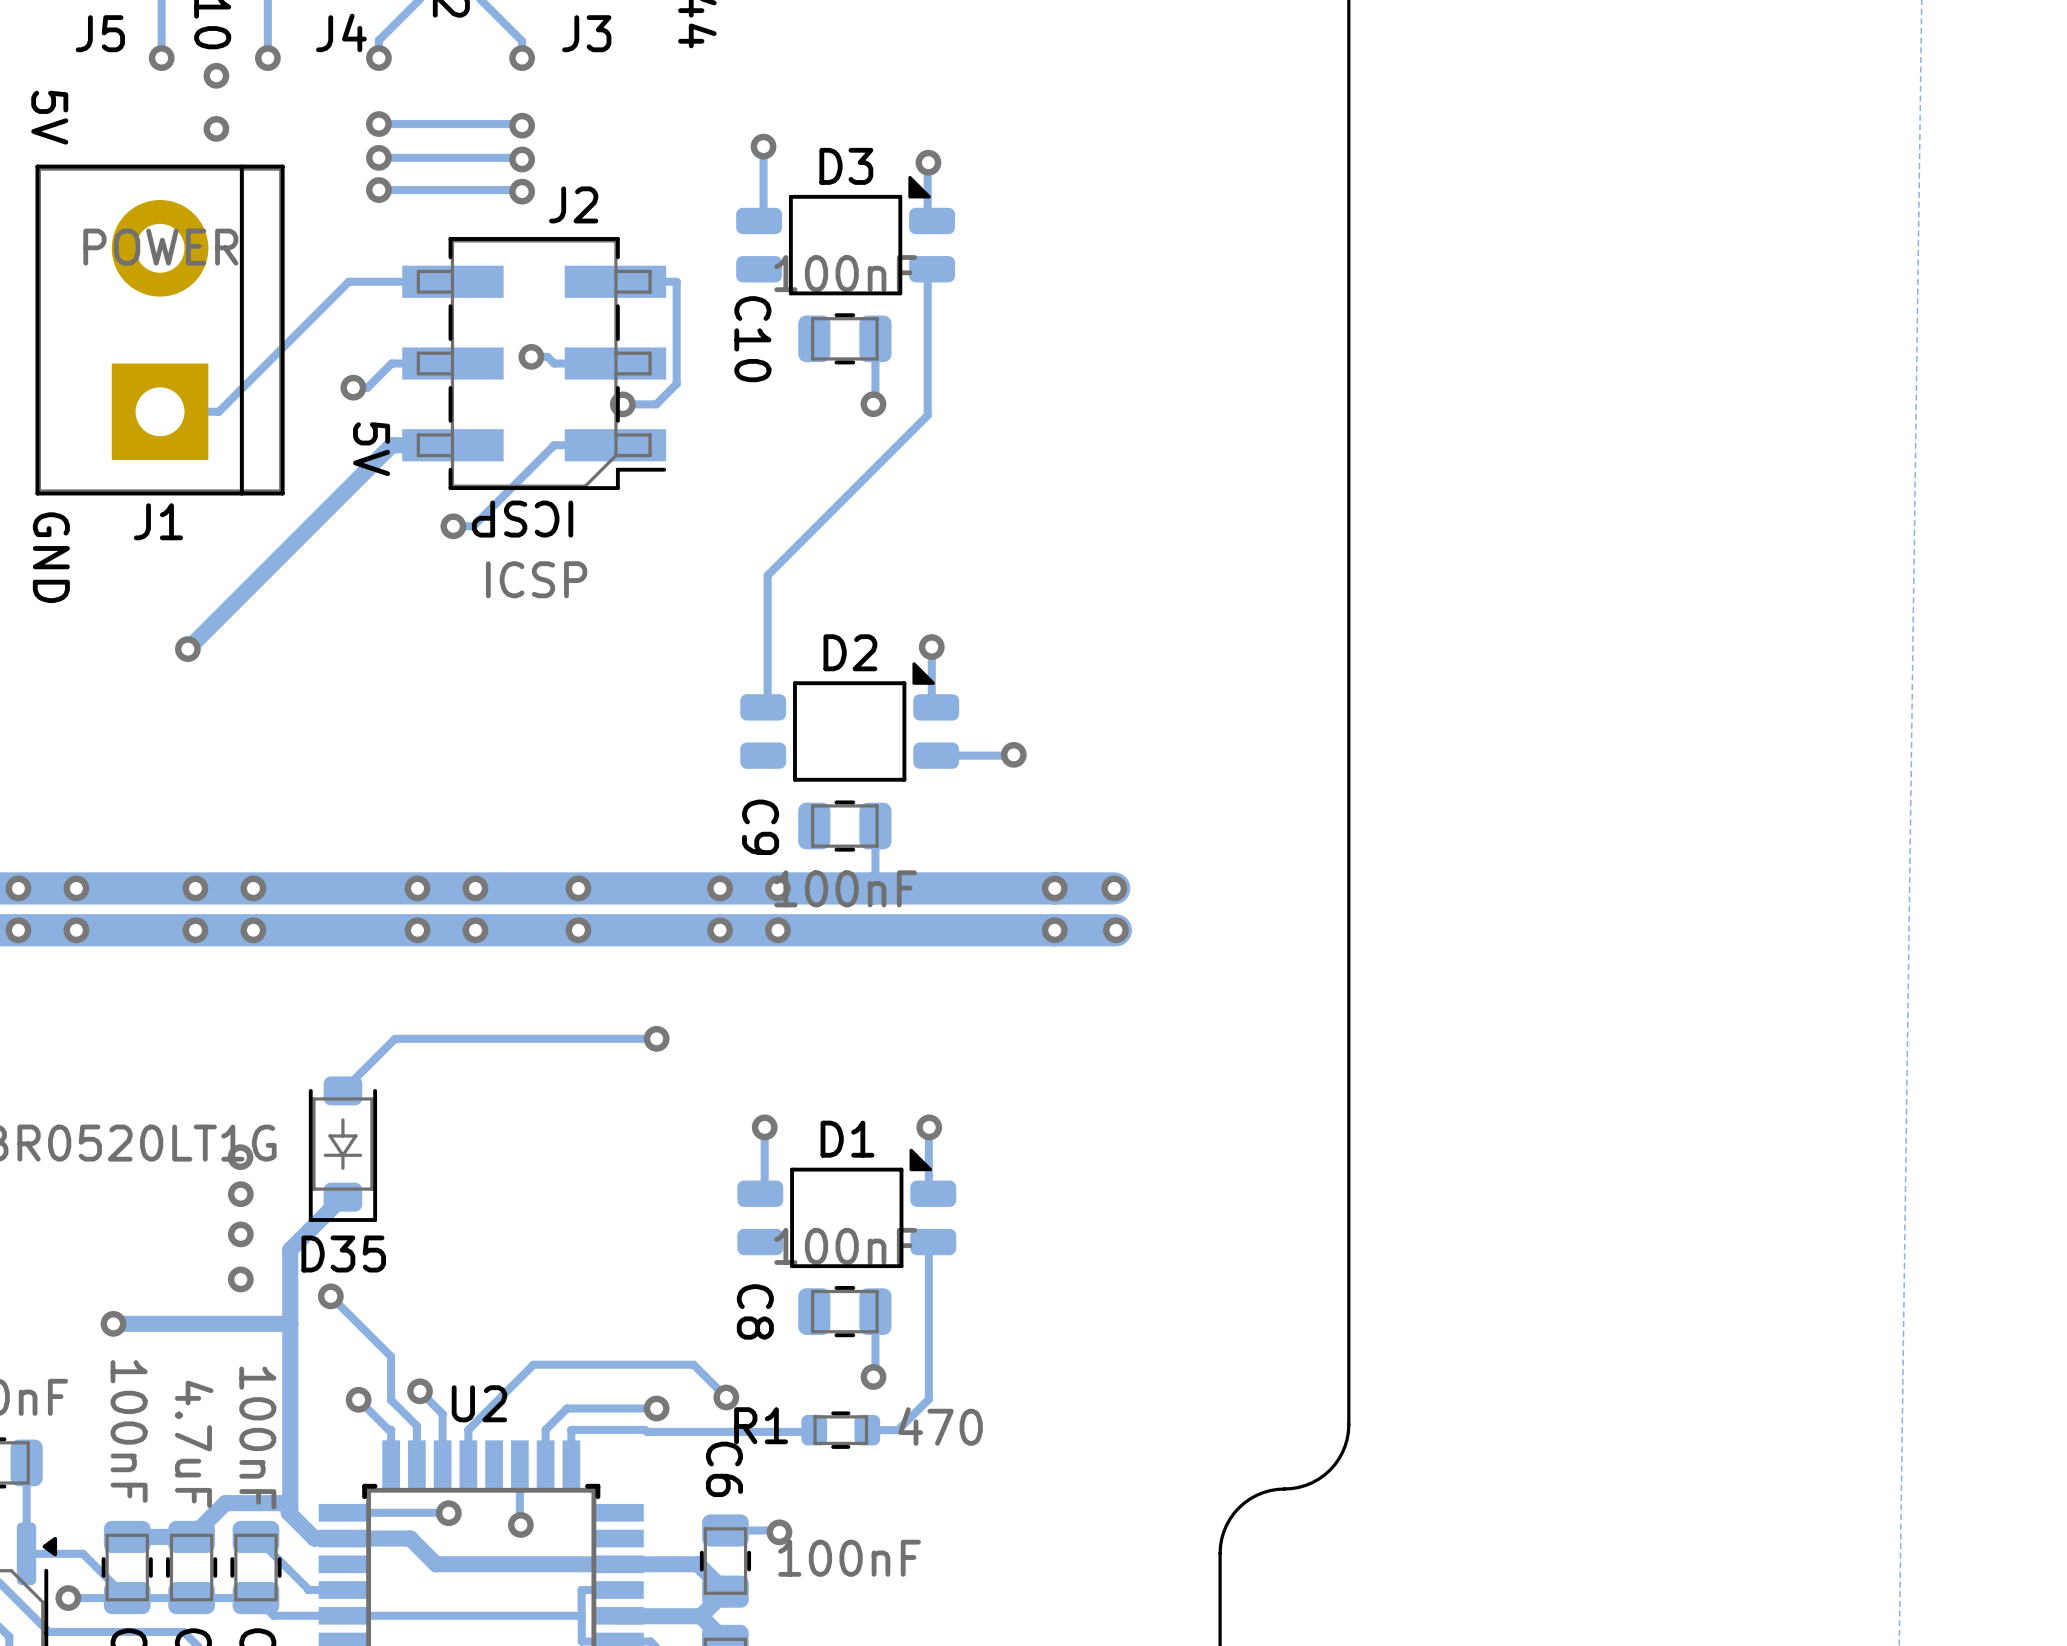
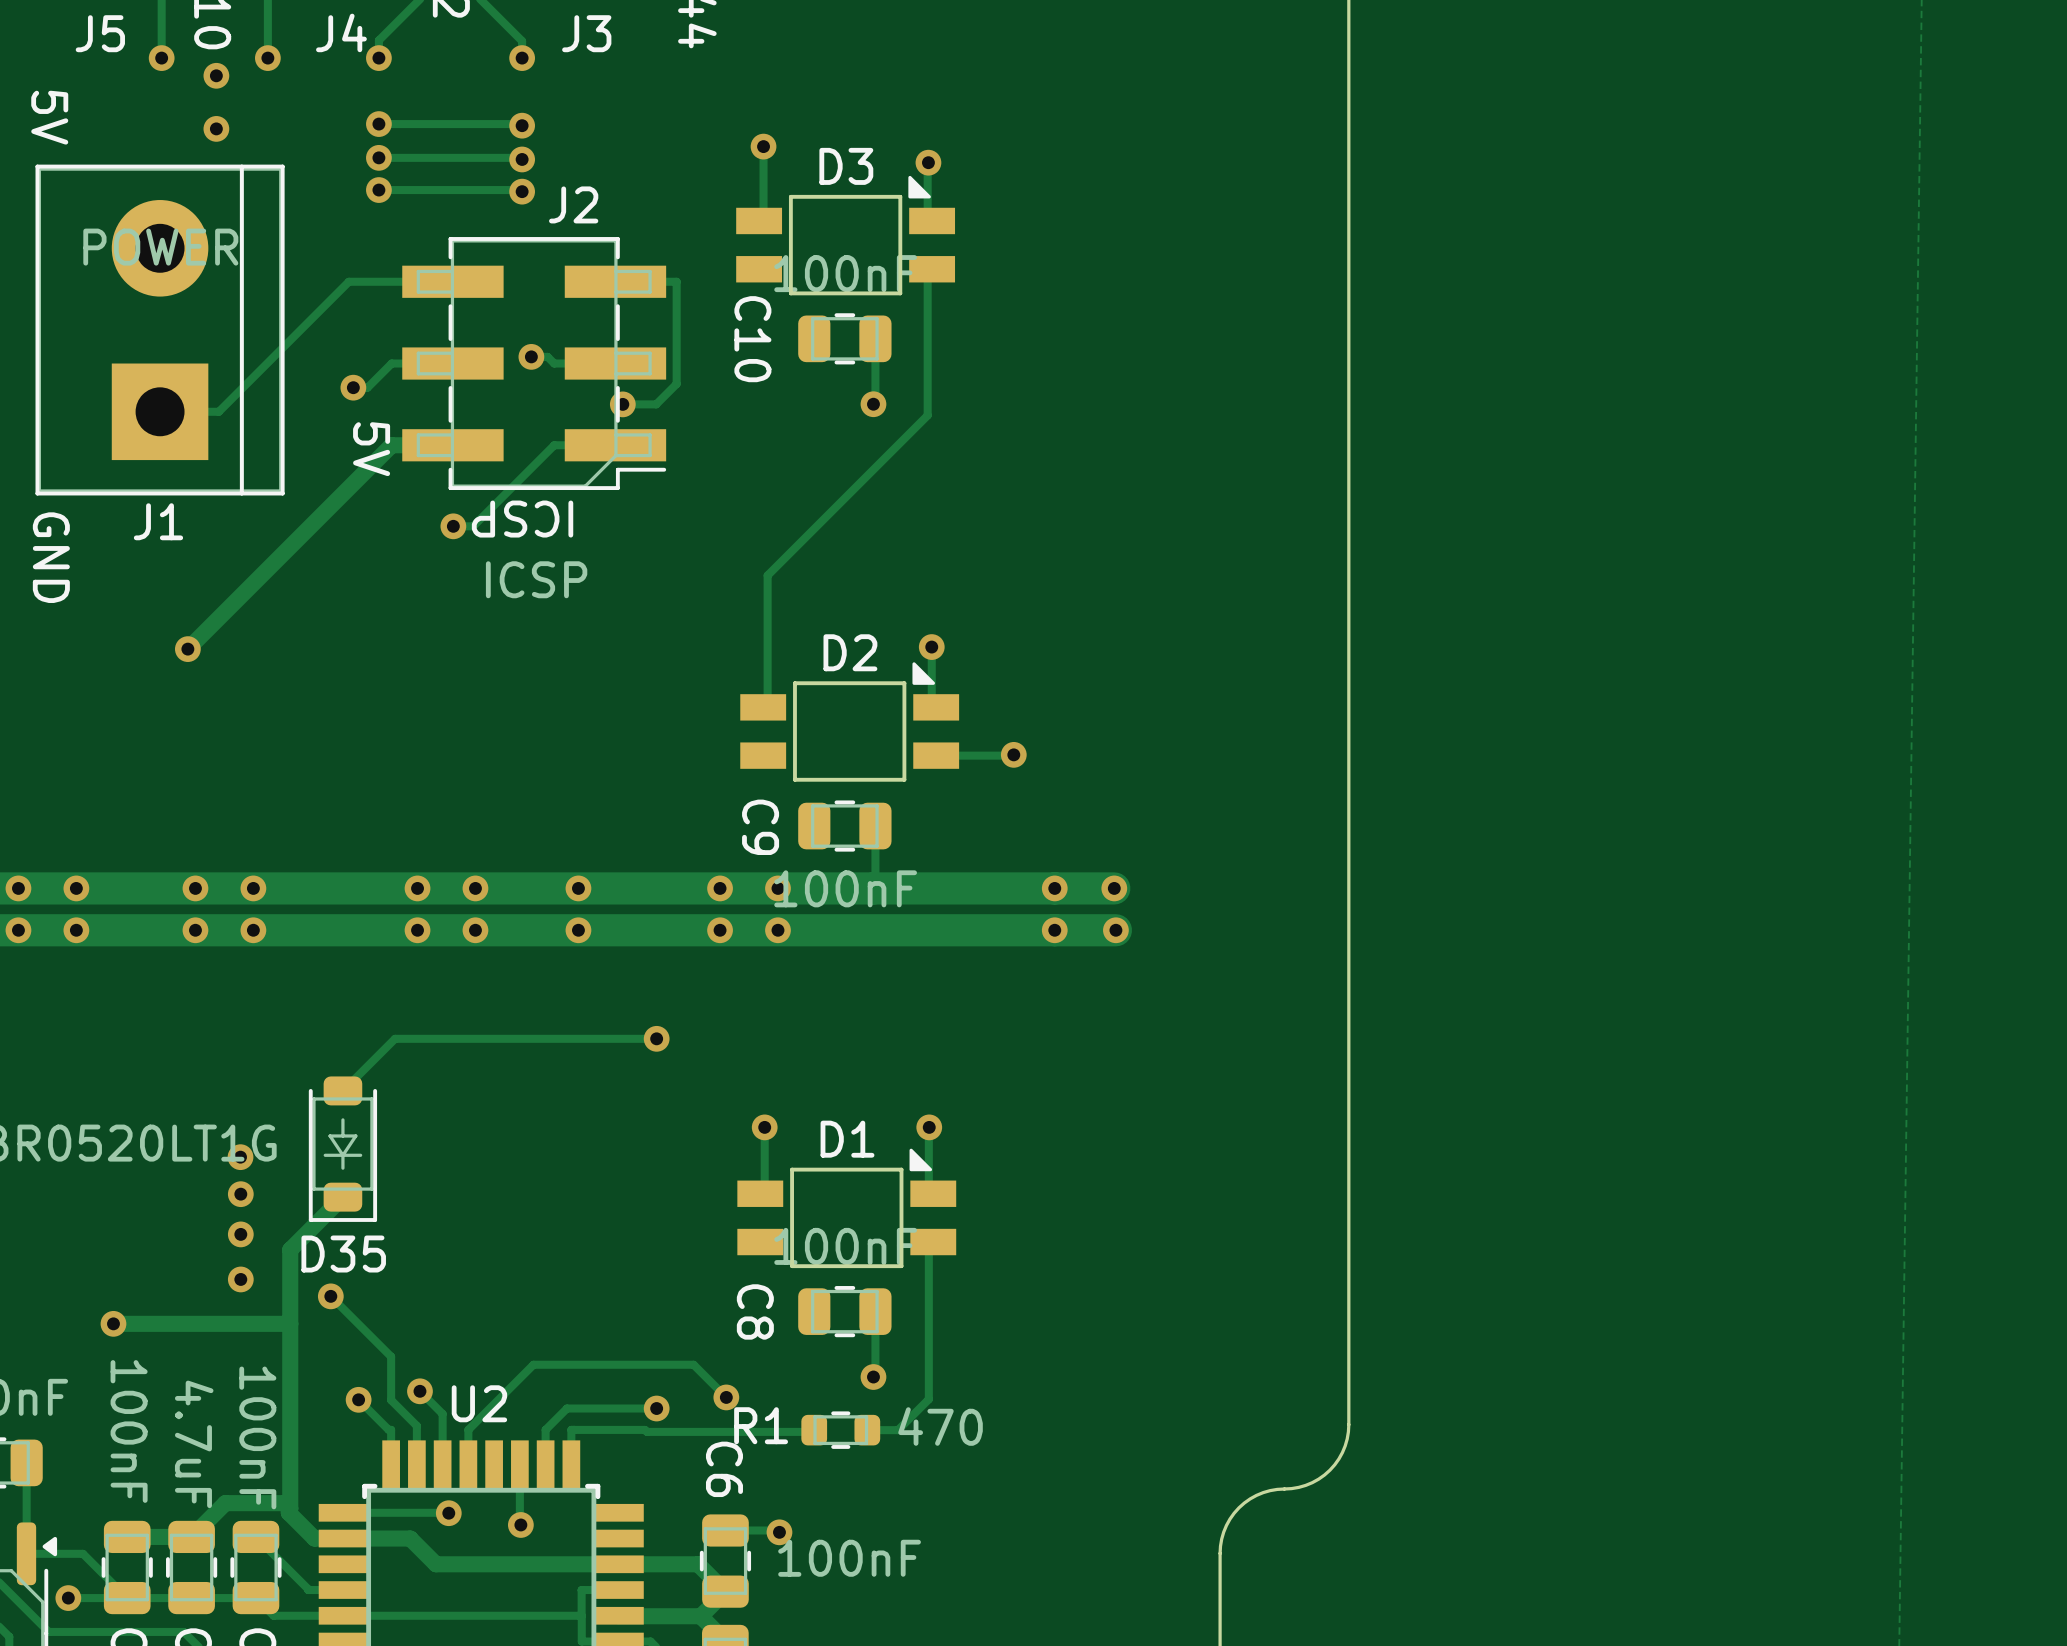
D3 footprint: [736, 175, 956, 296] -> [736, 175, 956, 296]
D2 footprint: [740, 662, 960, 782] -> [740, 662, 960, 782]
D1 footprint: [737, 1148, 957, 1269] -> [737, 1148, 957, 1269]

